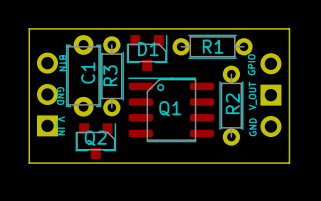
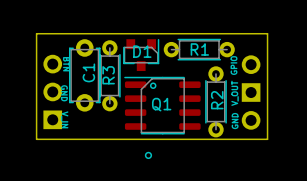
Q2: (95, 141) -> none
board edge: (29, 147) (29, 163) (289, 163) (289, 147) -> (36, 139) (267, 139)
drawing: none -> [144, 151, 153, 159]

